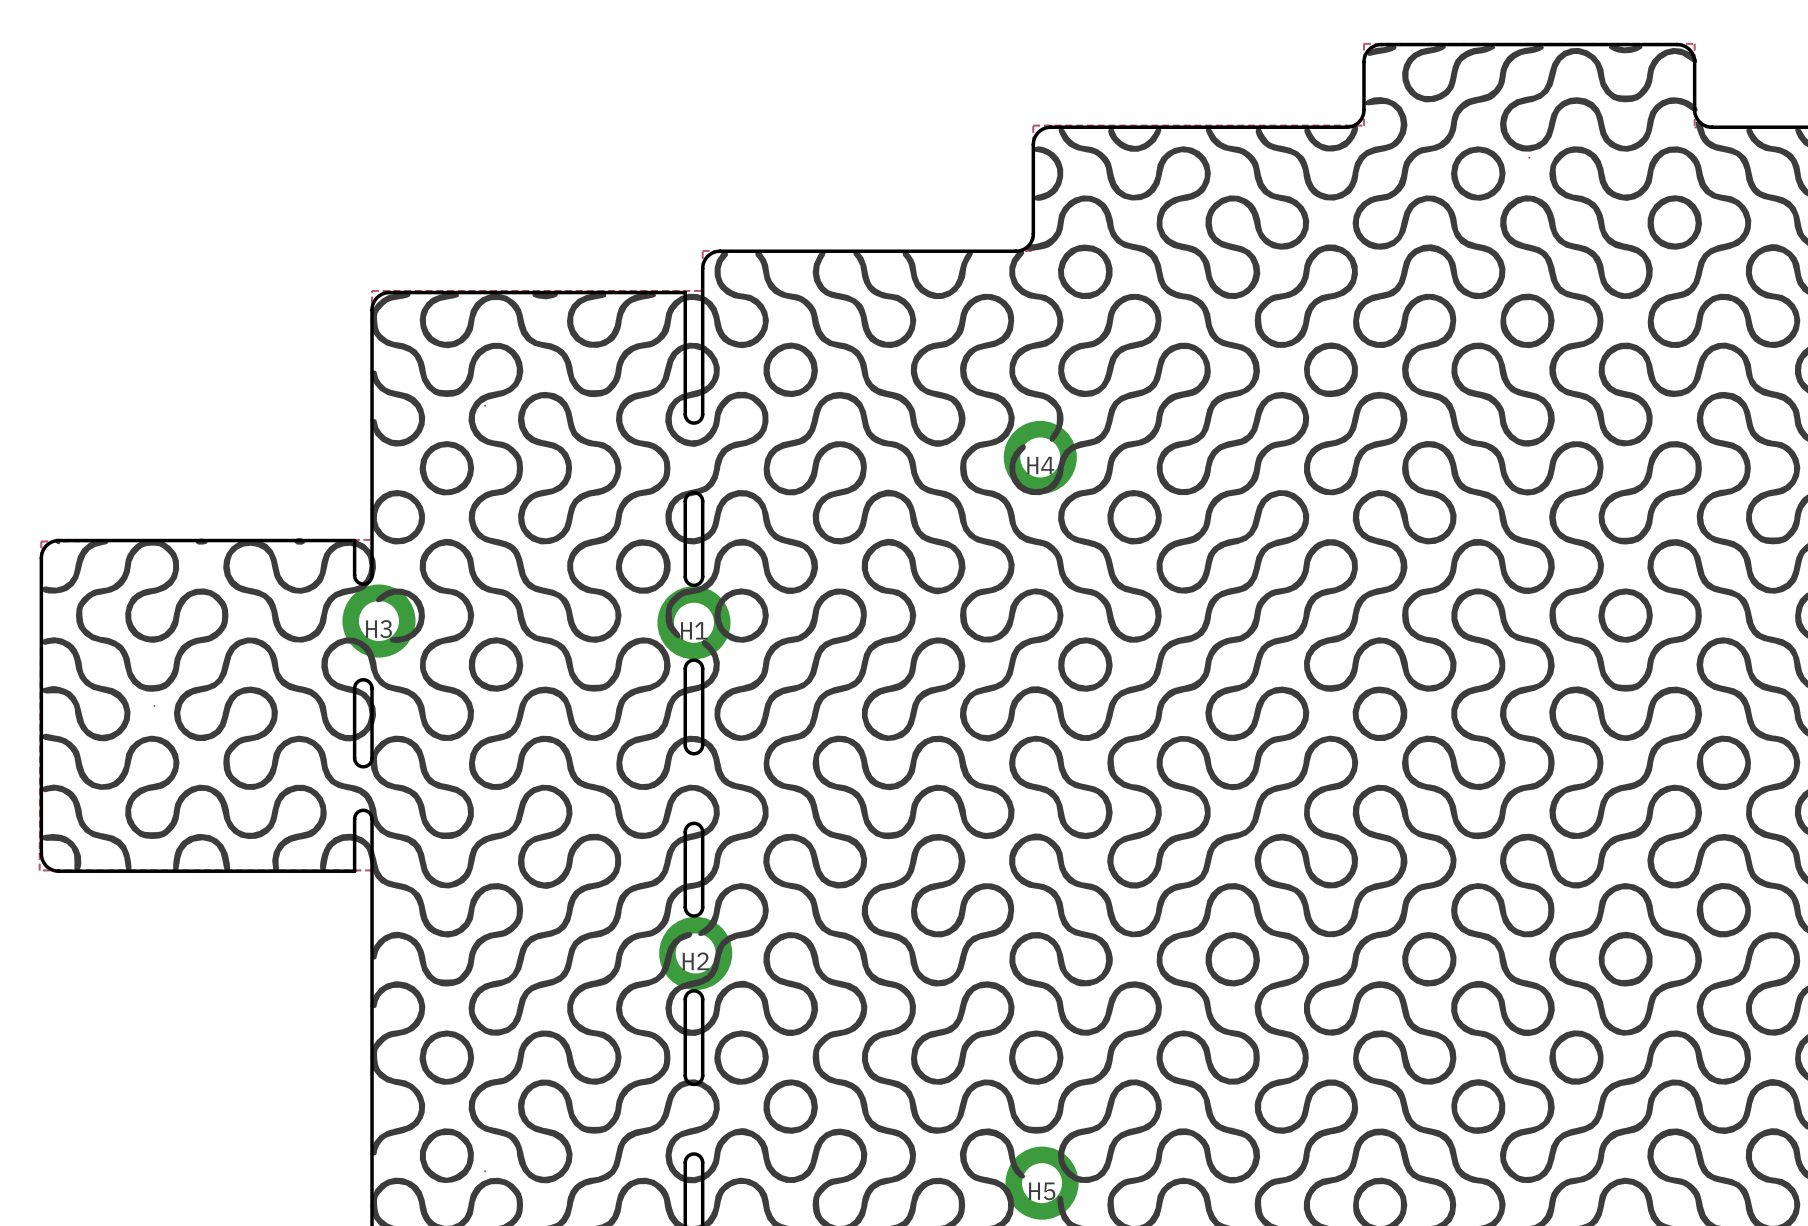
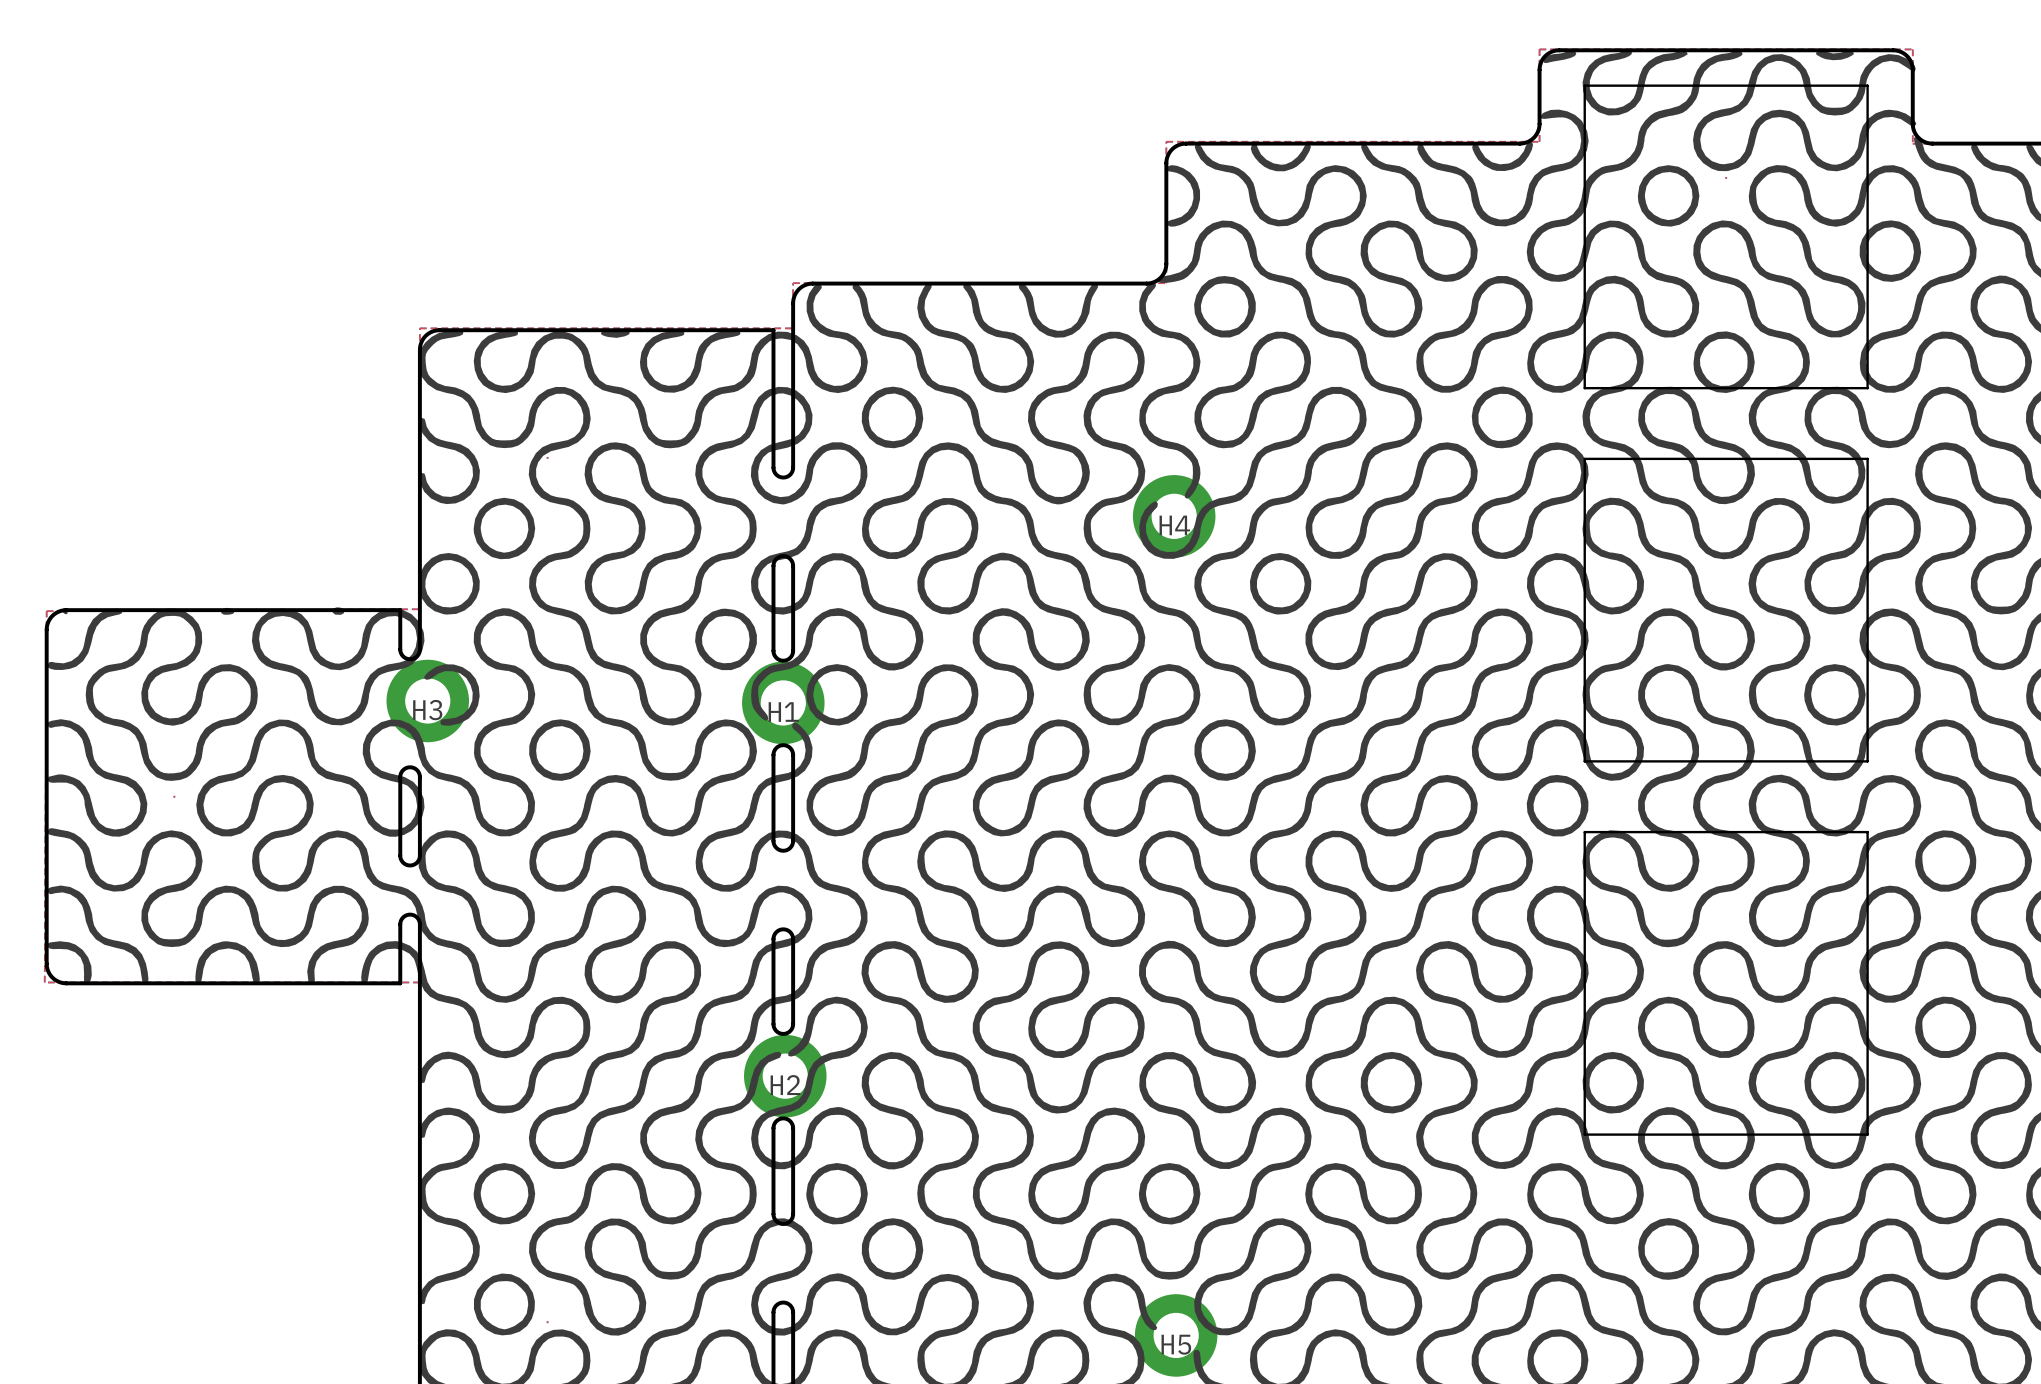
drawing: none -> [1583, 84, 1869, 390]
drawing: none -> [1583, 457, 1869, 763]
drawing: none -> [1583, 830, 1869, 1136]

